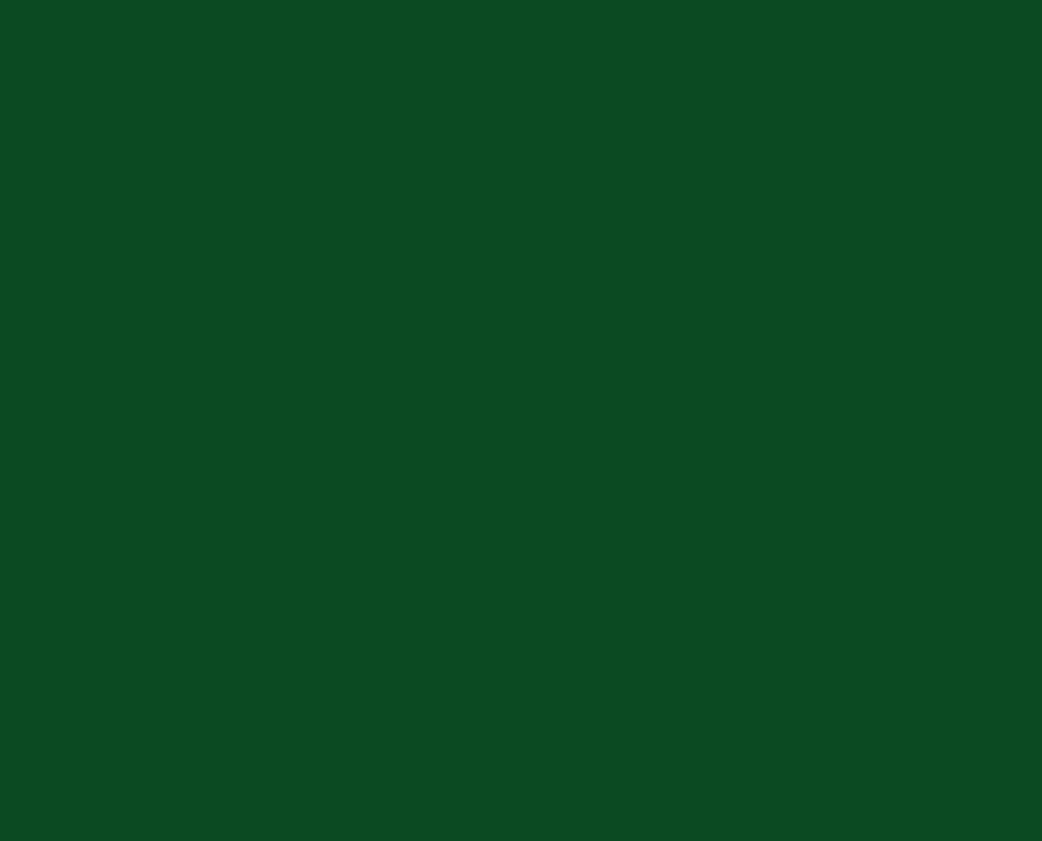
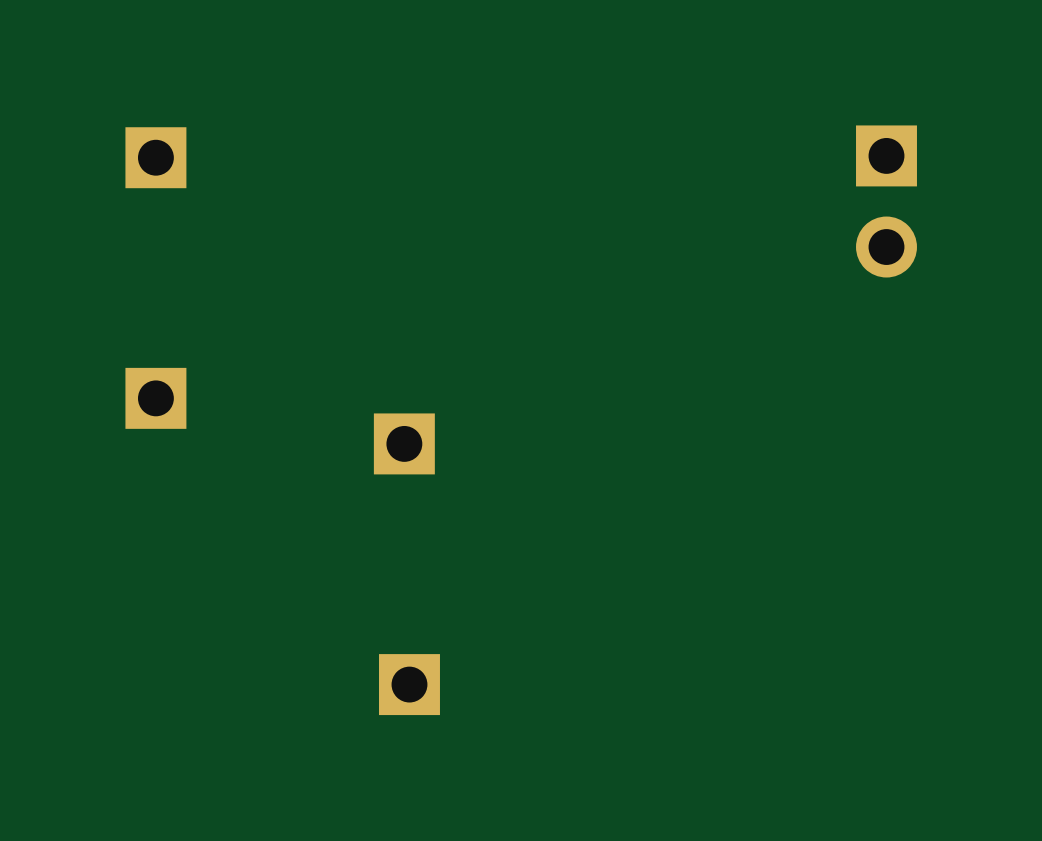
part: none -> (155, 157)
part: none -> (886, 201)
part: none -> (155, 398)
part: none -> (404, 443)
part: none -> (409, 684)

